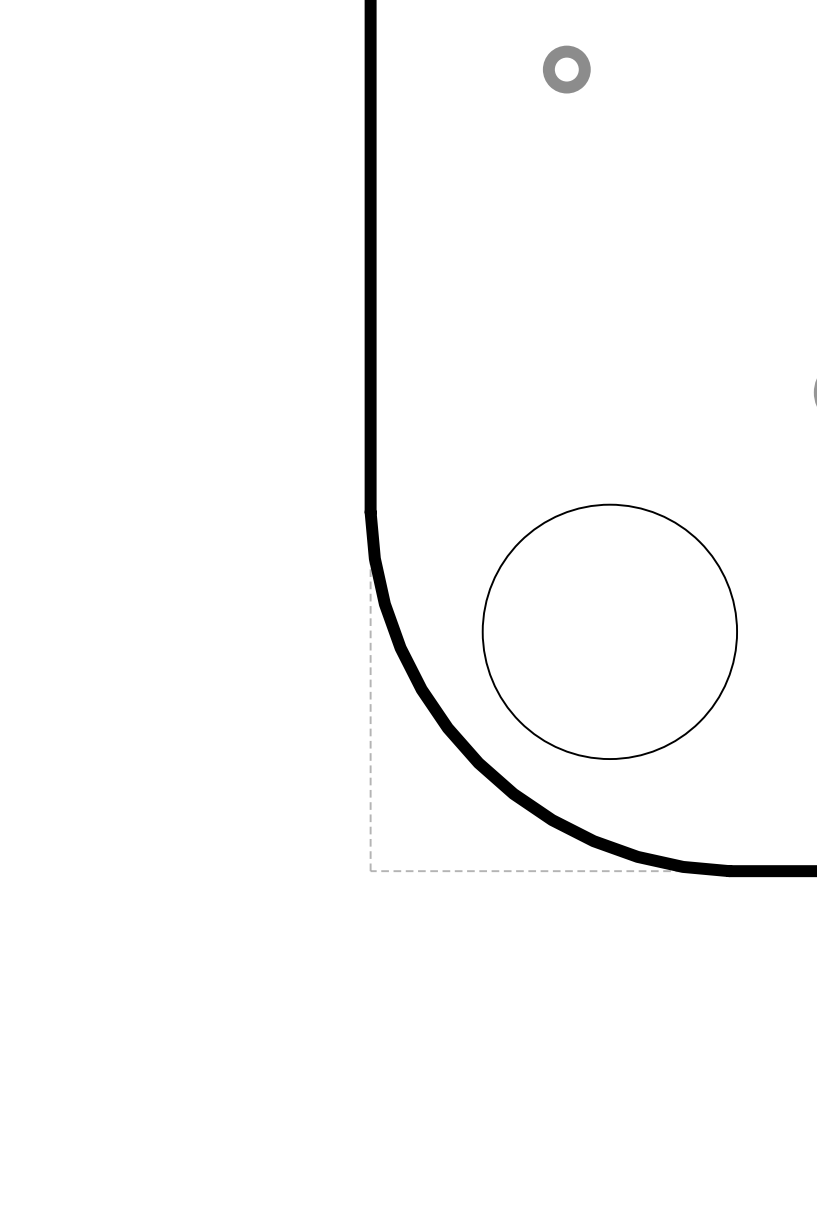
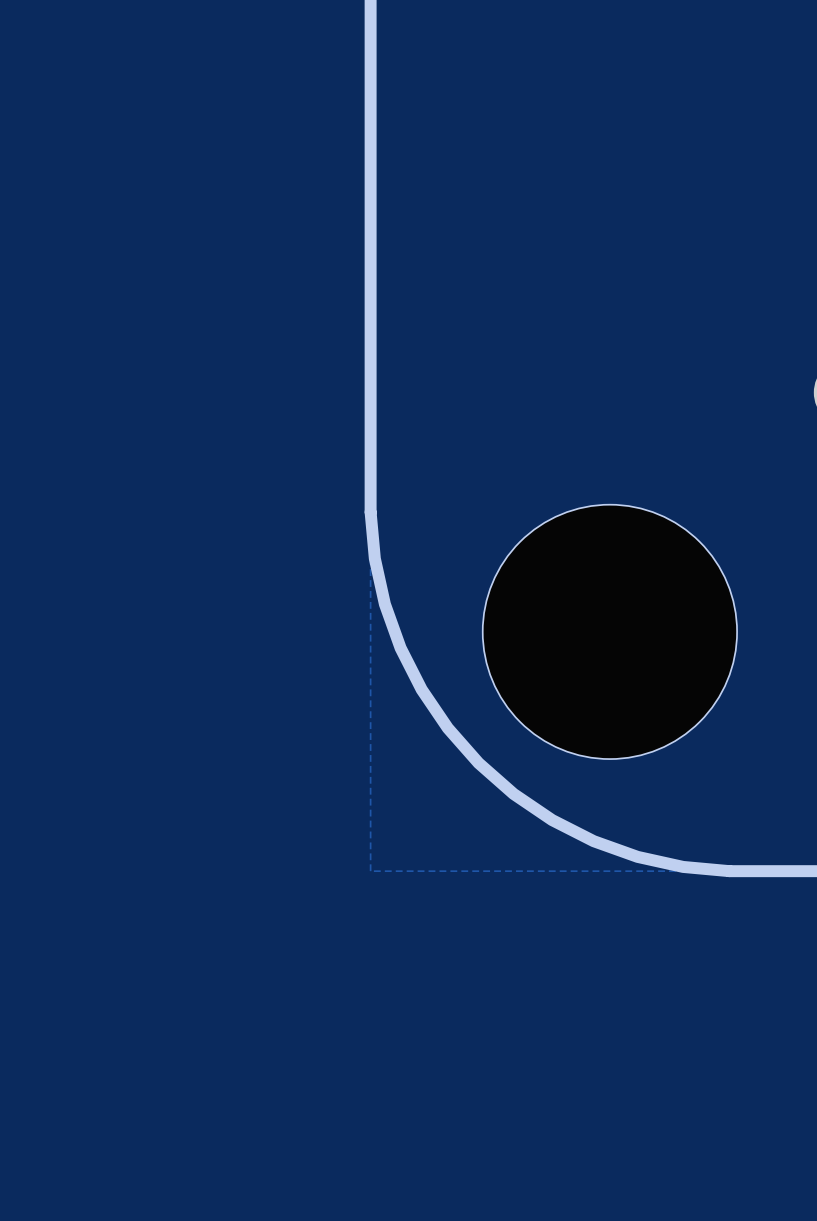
via: (566, 69) -> none

